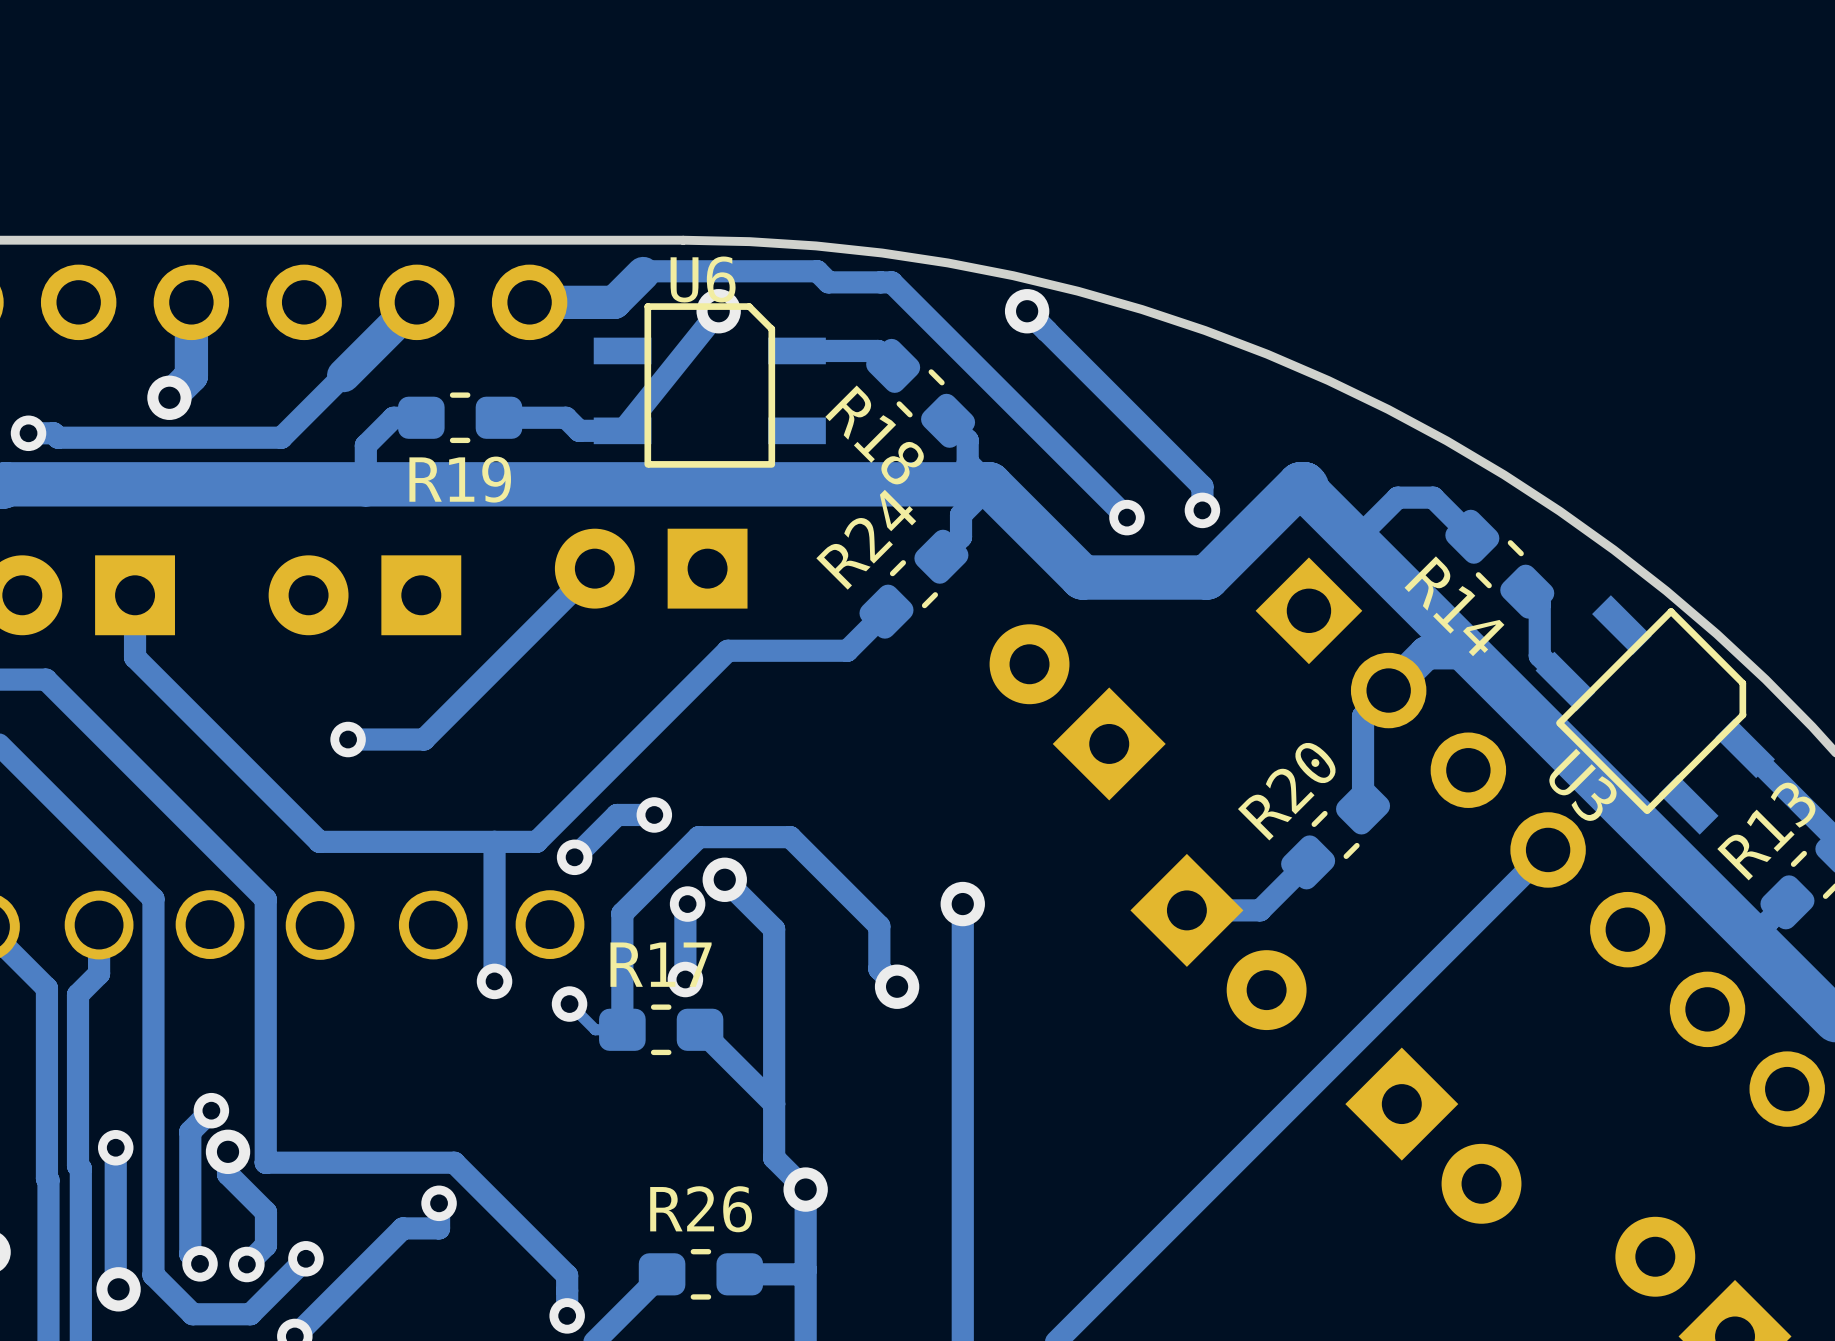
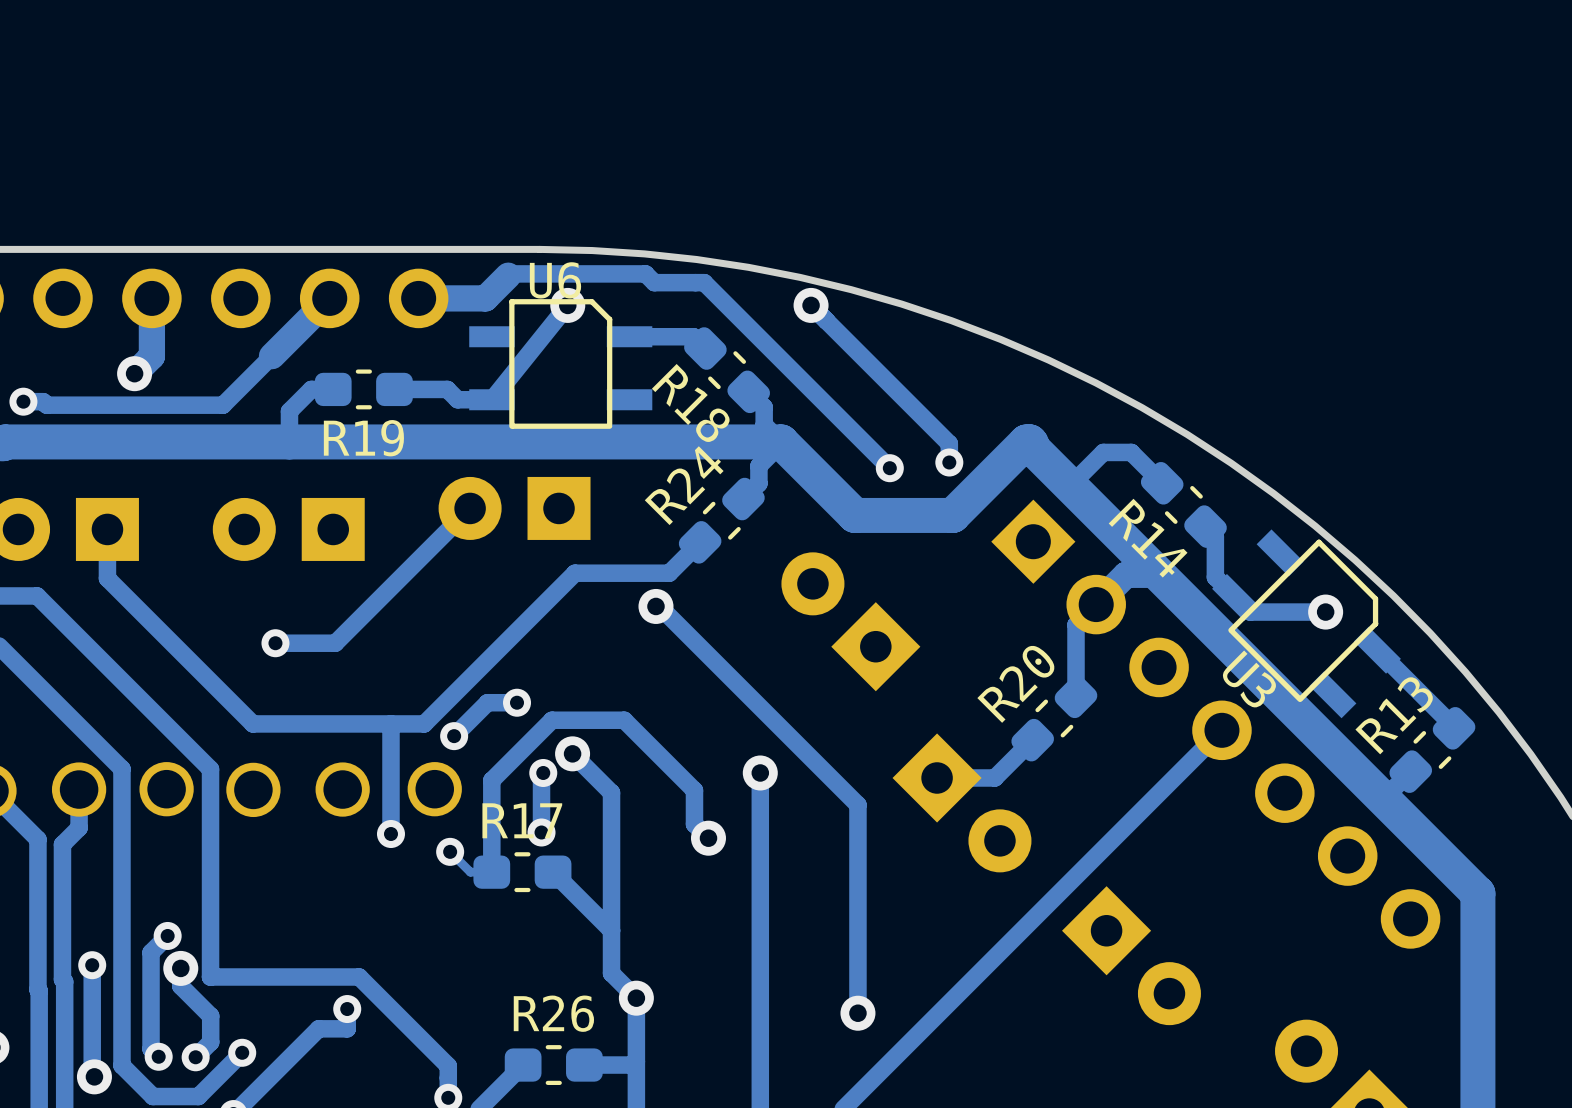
track: none -> (1235, 597) (1250, 612) (1325, 612)
track: none -> (655, 606) (659, 606) (857, 804) (857, 1013)
via: none -> (655, 606)
via: none -> (1325, 612)
via: none -> (857, 1013)

